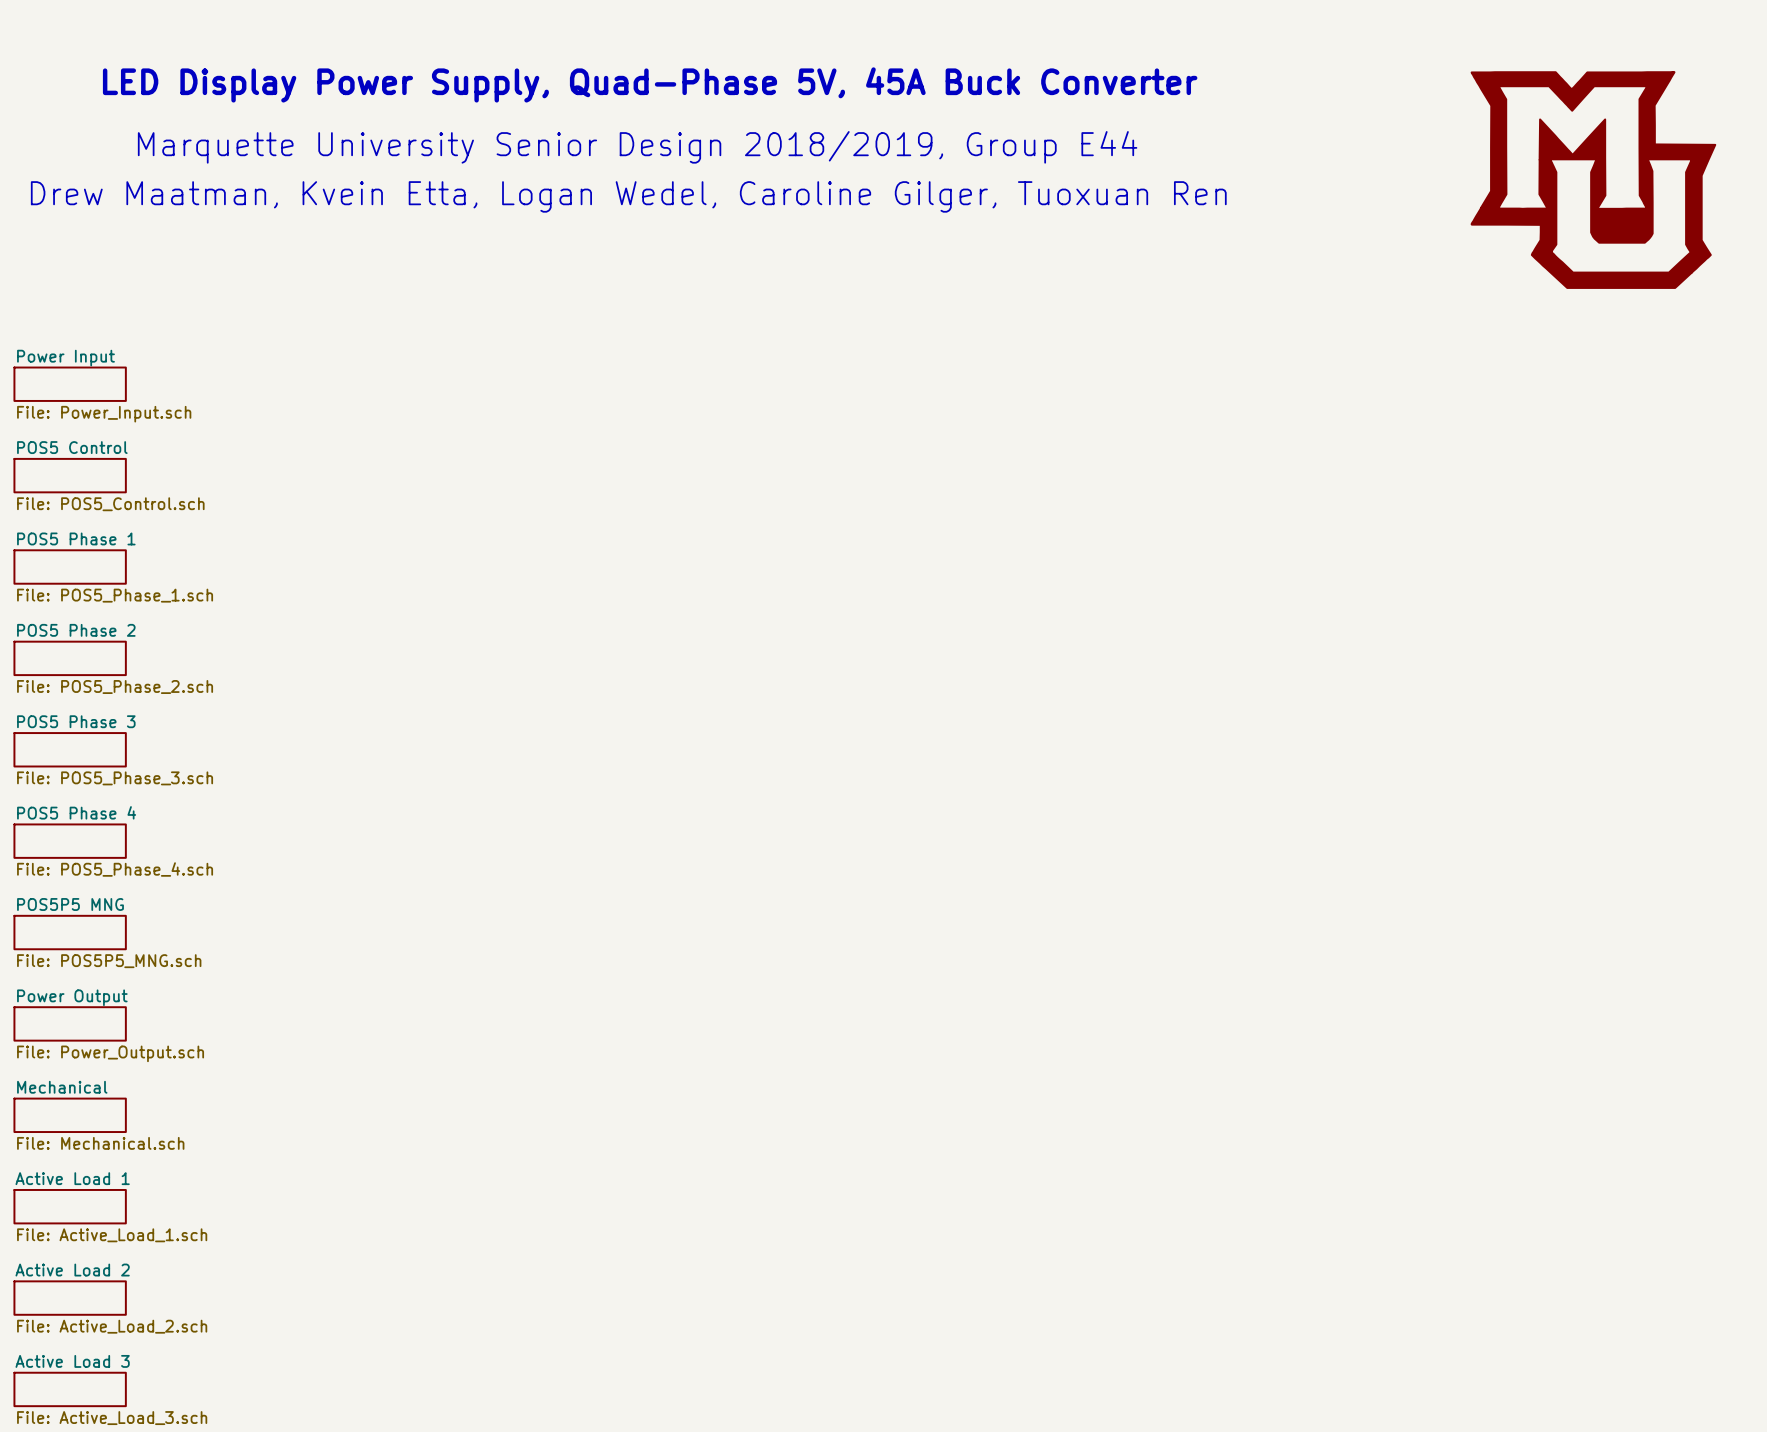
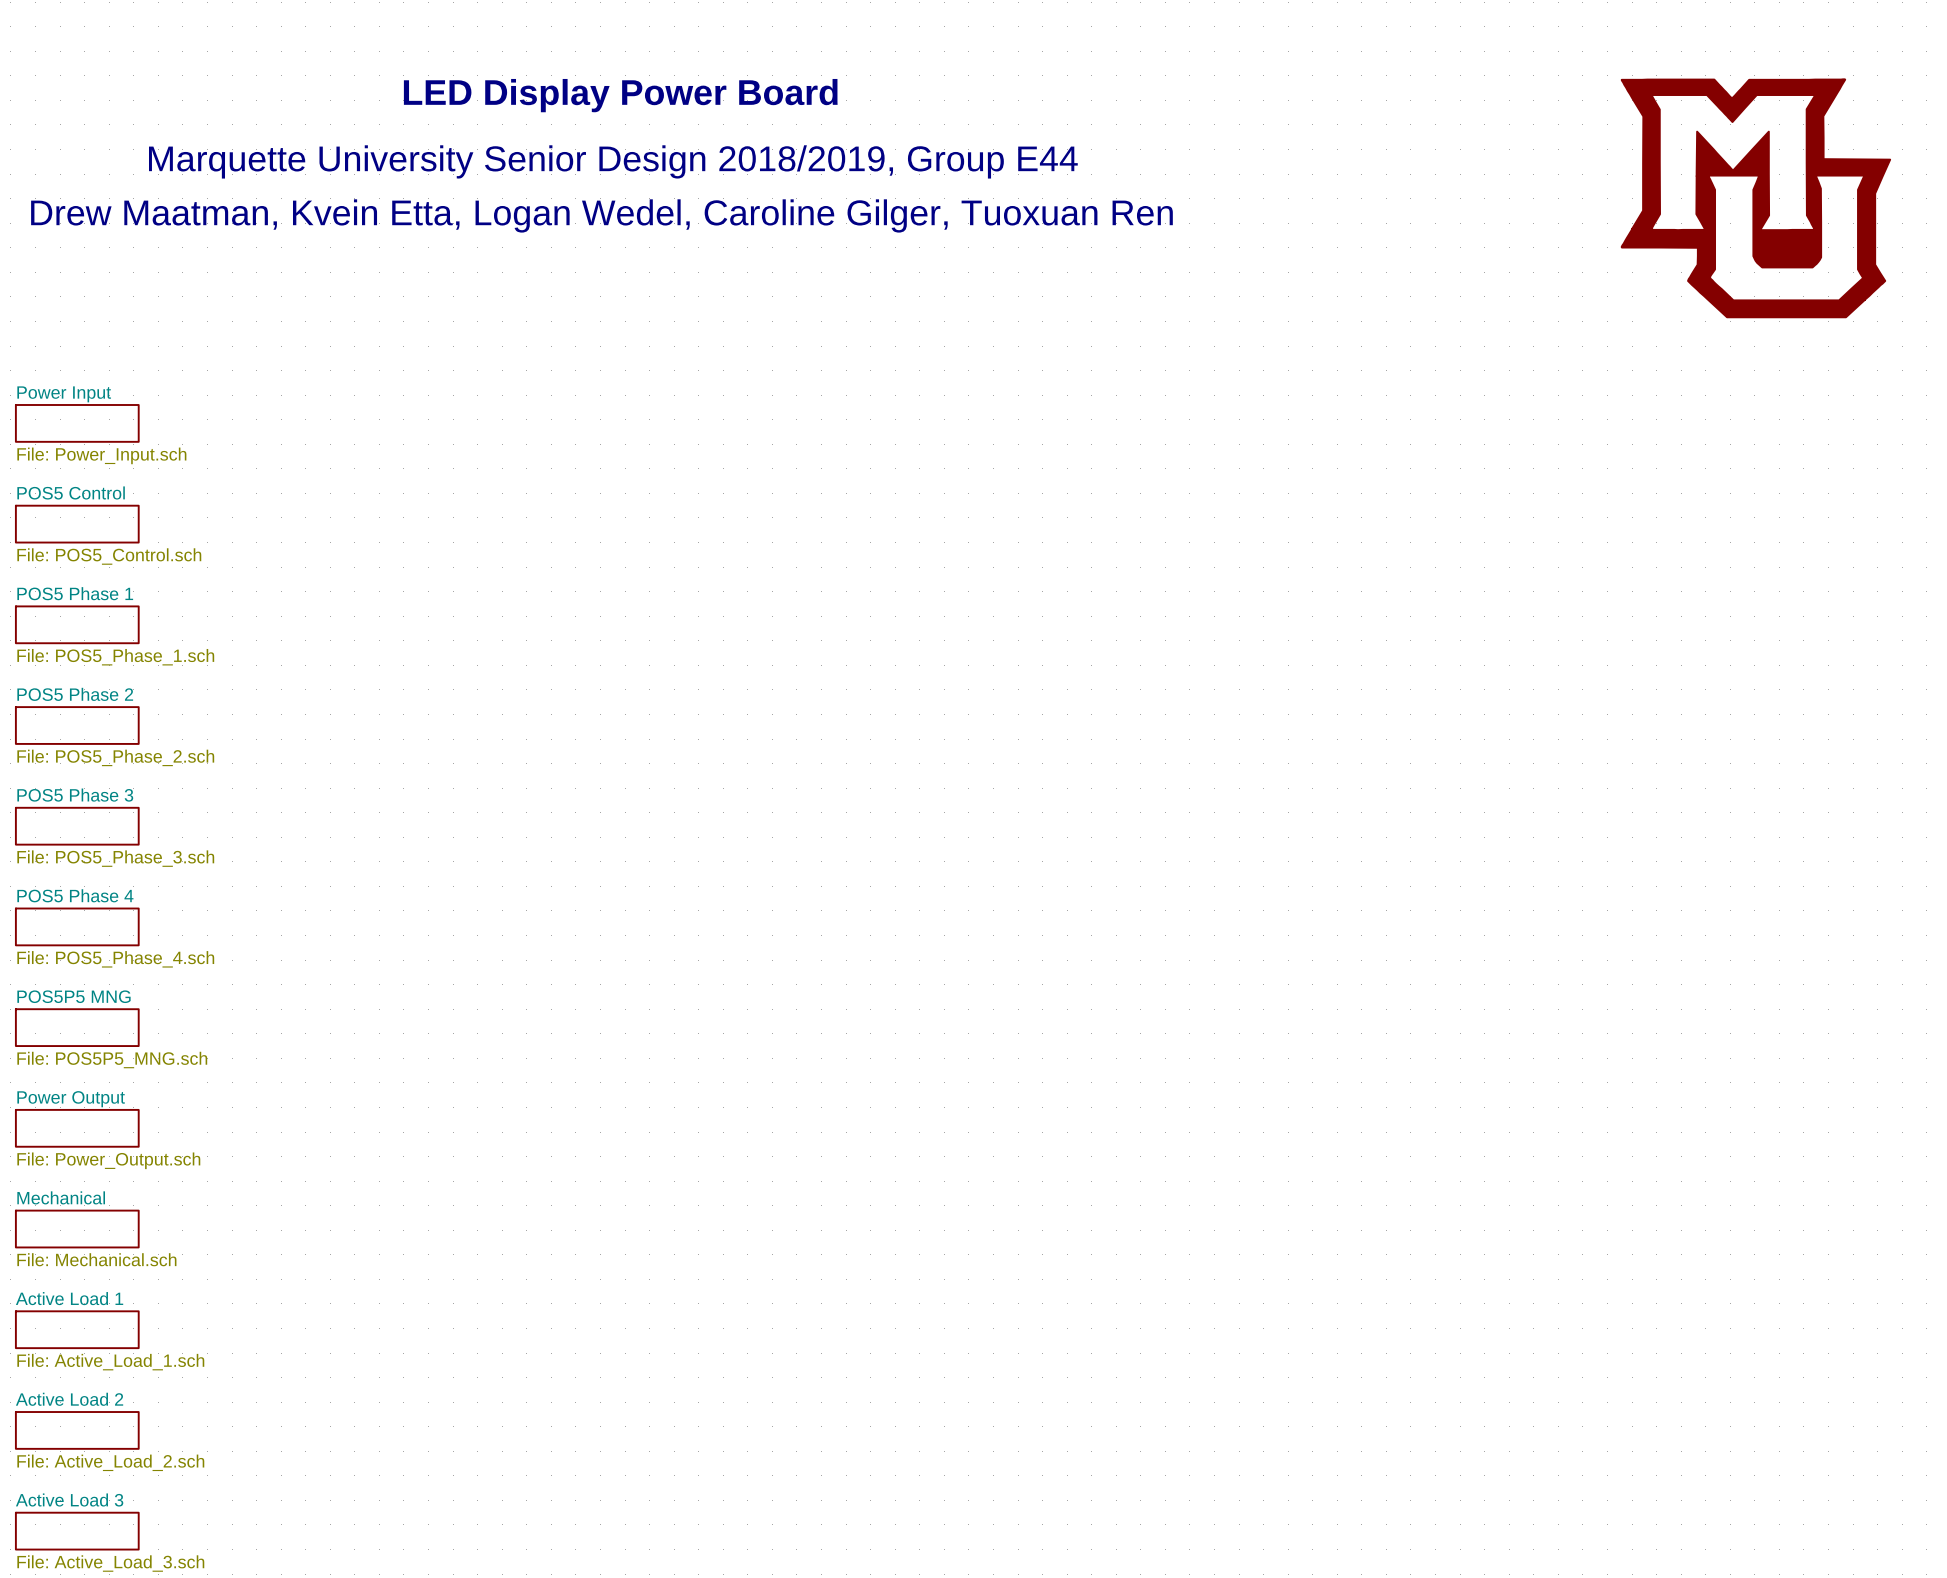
text: LED Display Power Supply, Quad-Phase 5V, 45A Buck Converter (650, 84) -> none
text: none -> LED Display Power Board (620, 95)

